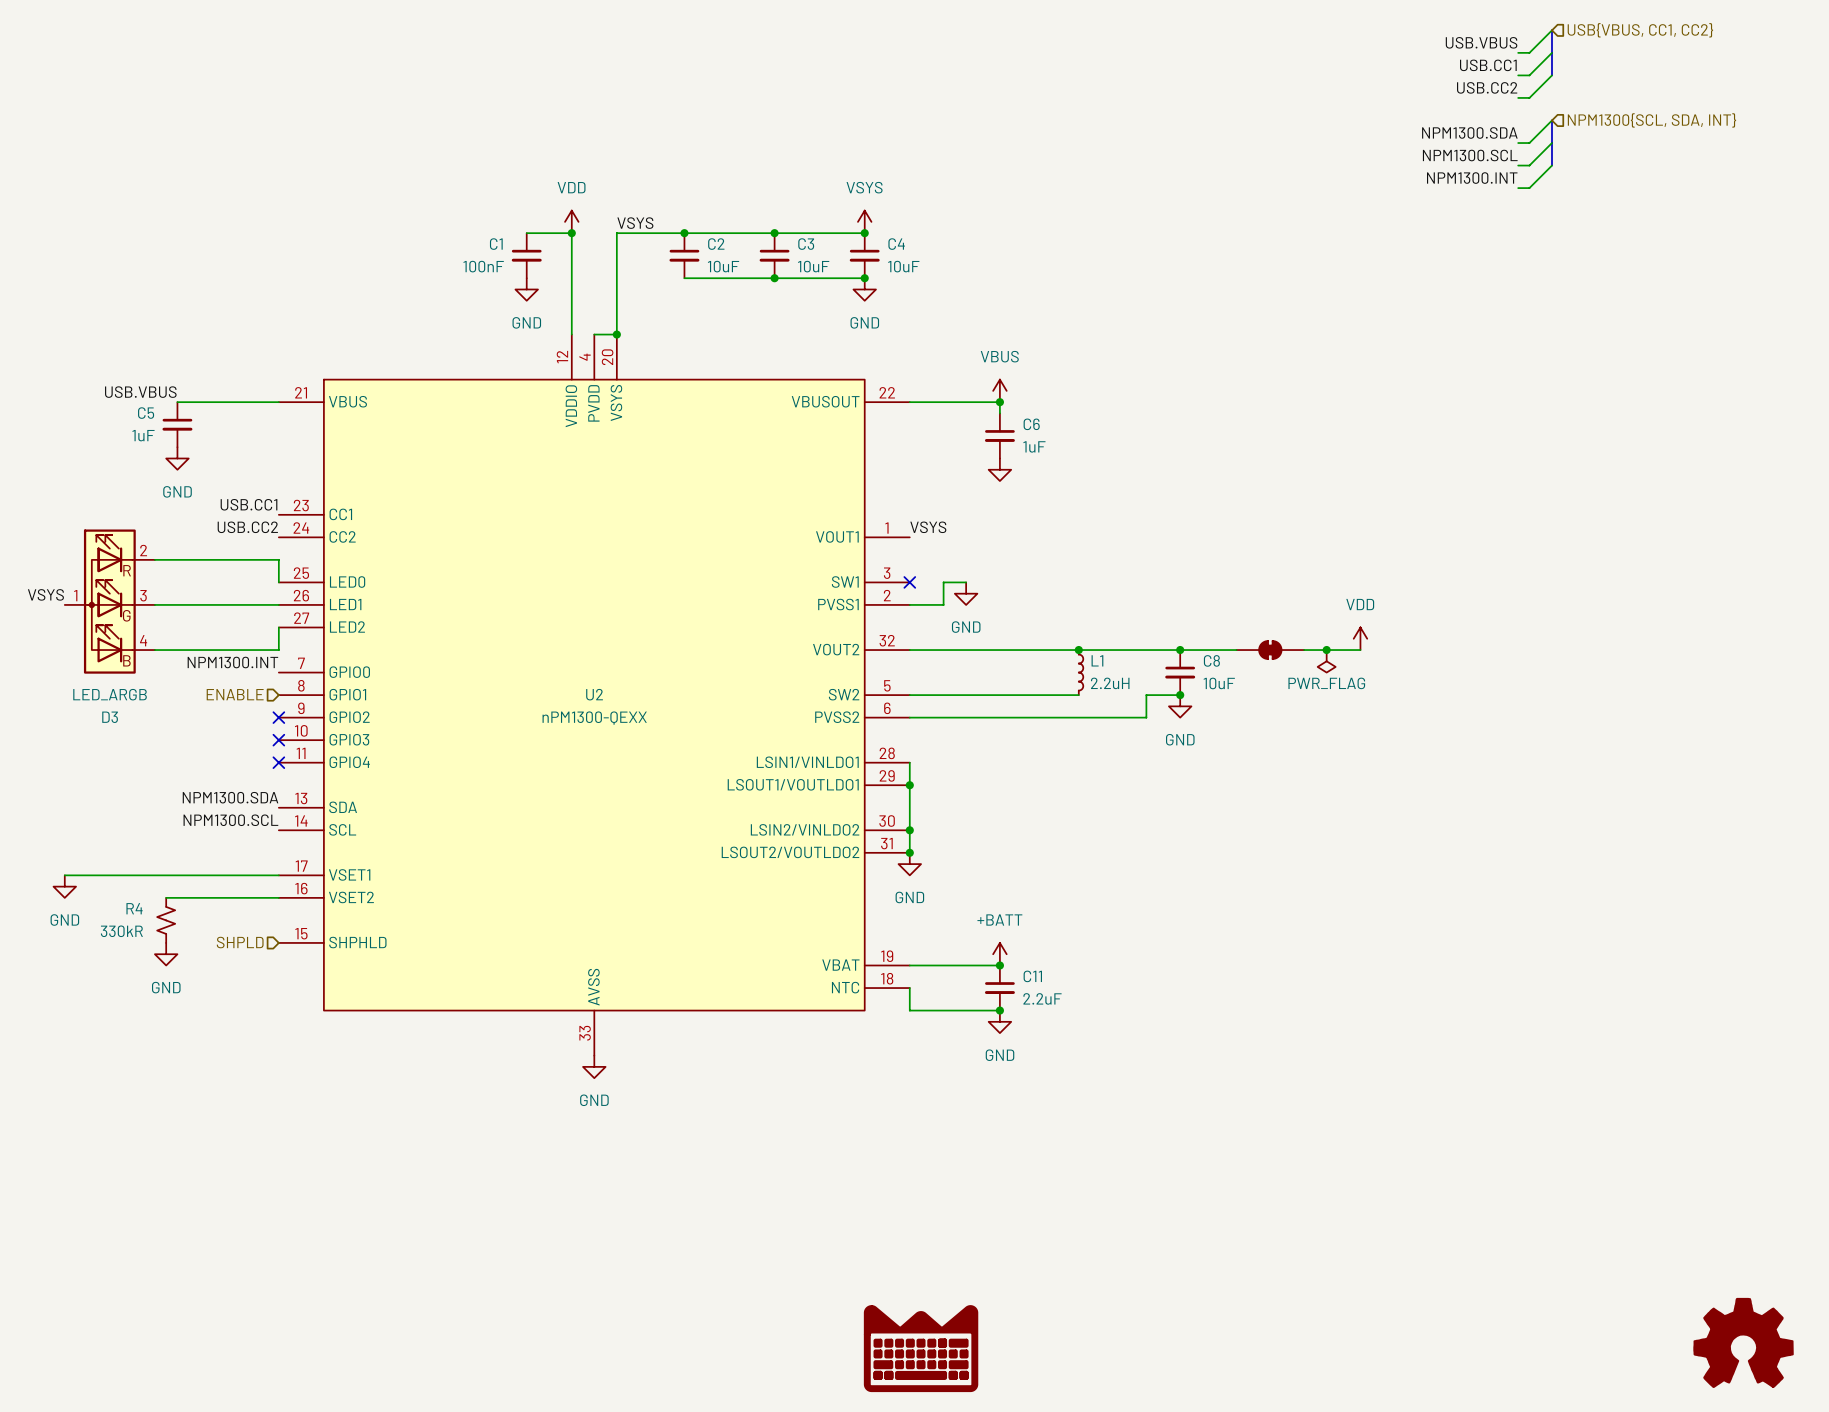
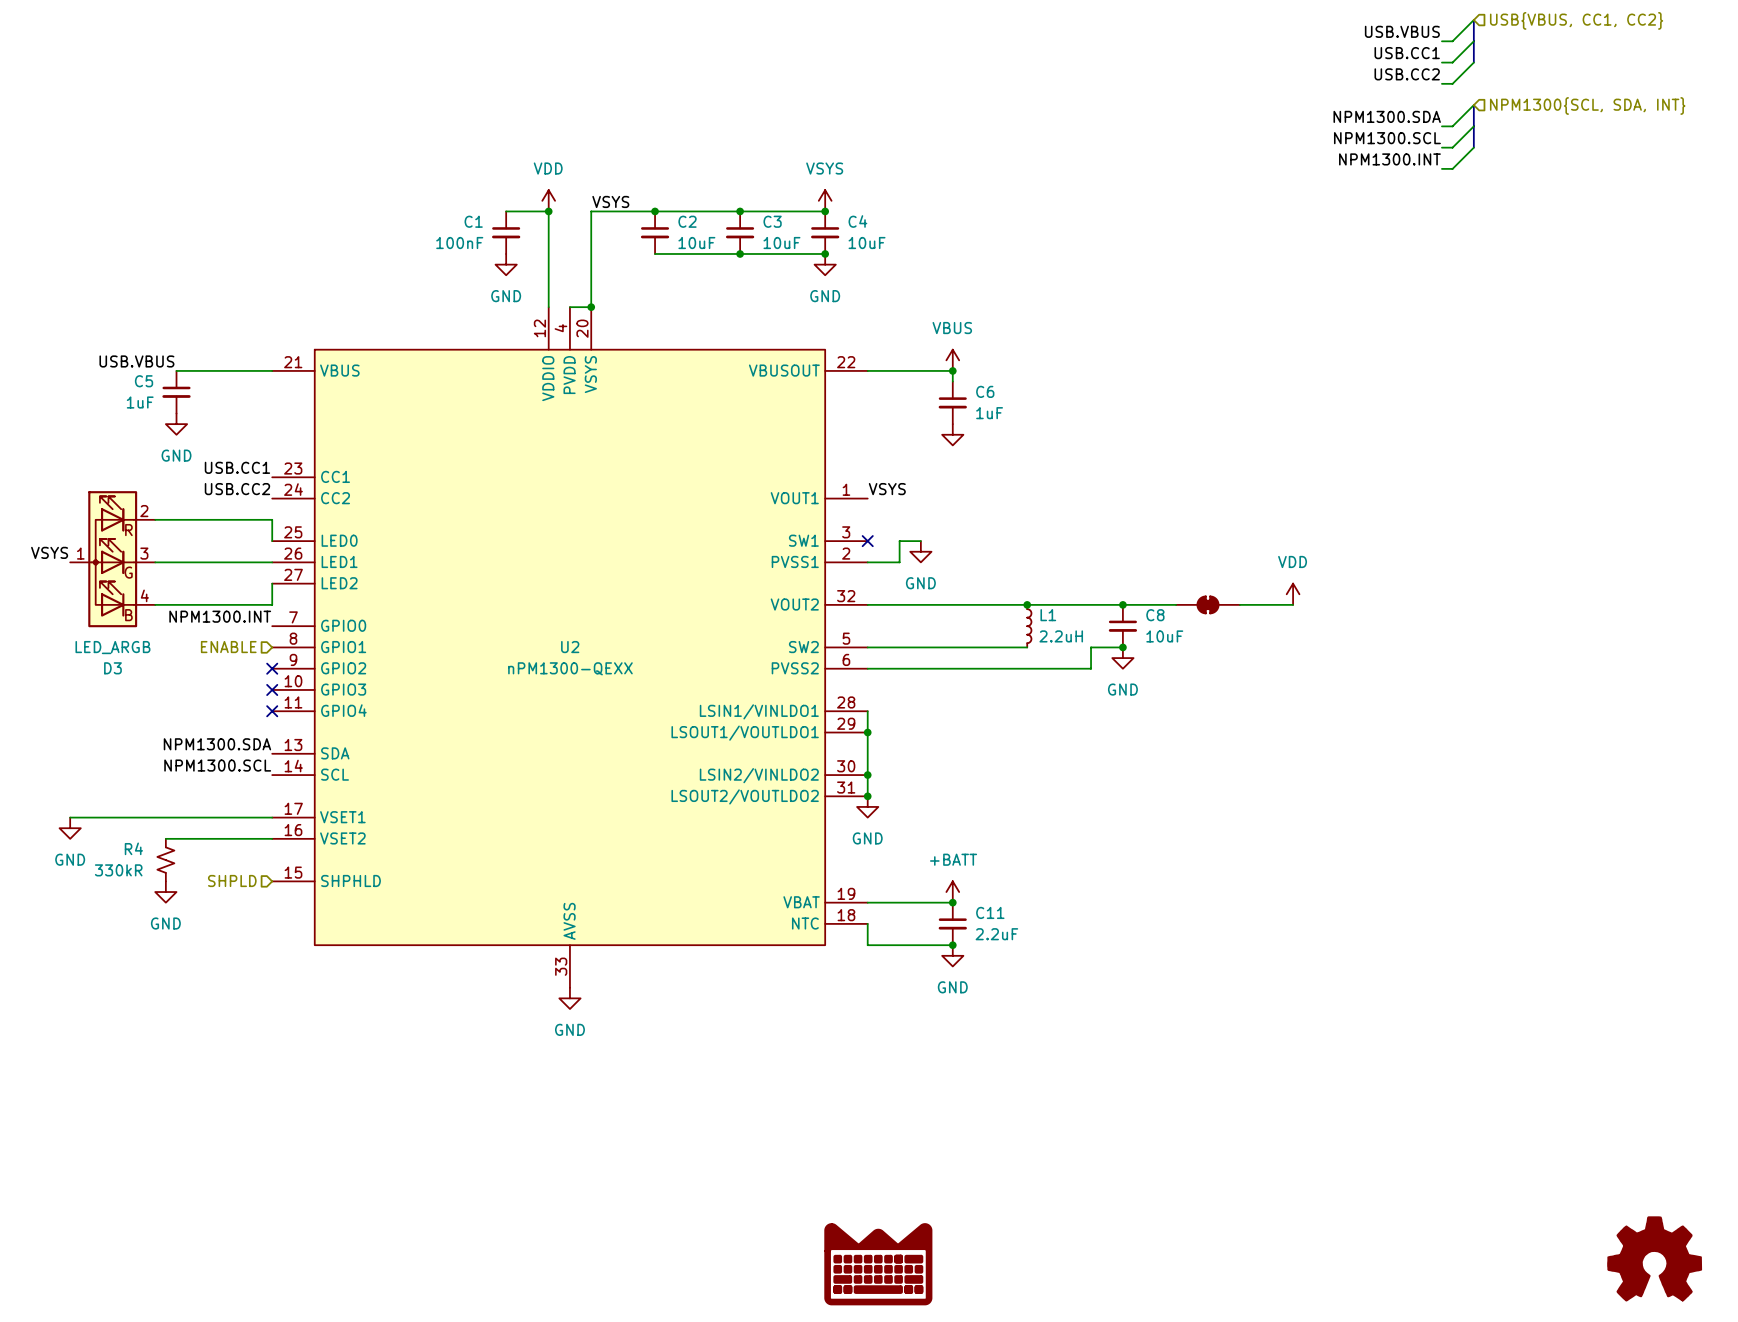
junction: (1326, 650) -> none
power symbol: PWR_FLAG (1326, 661) -> none

